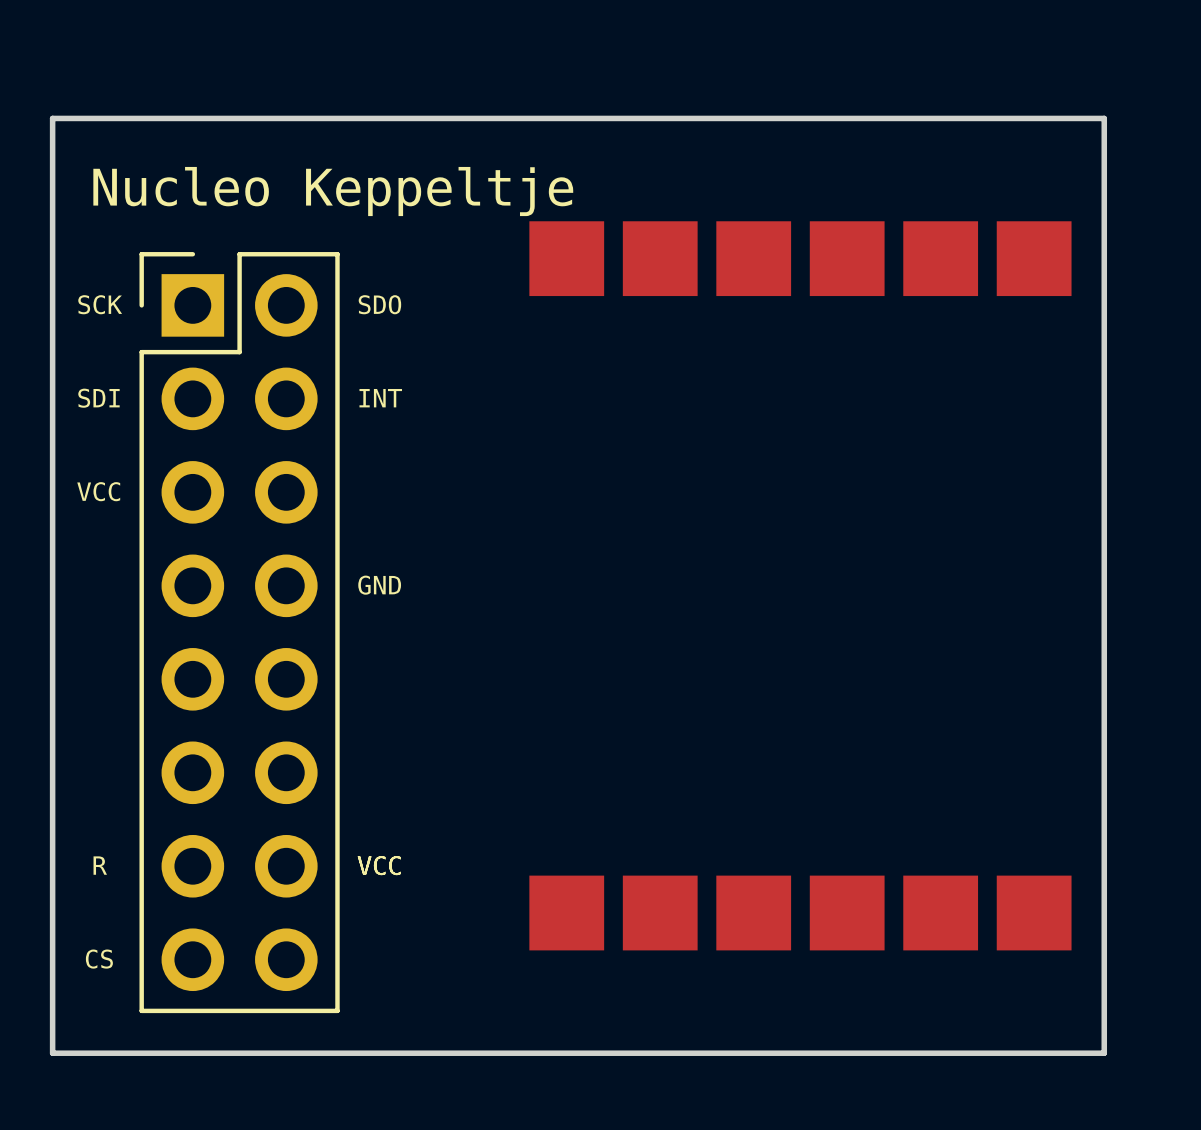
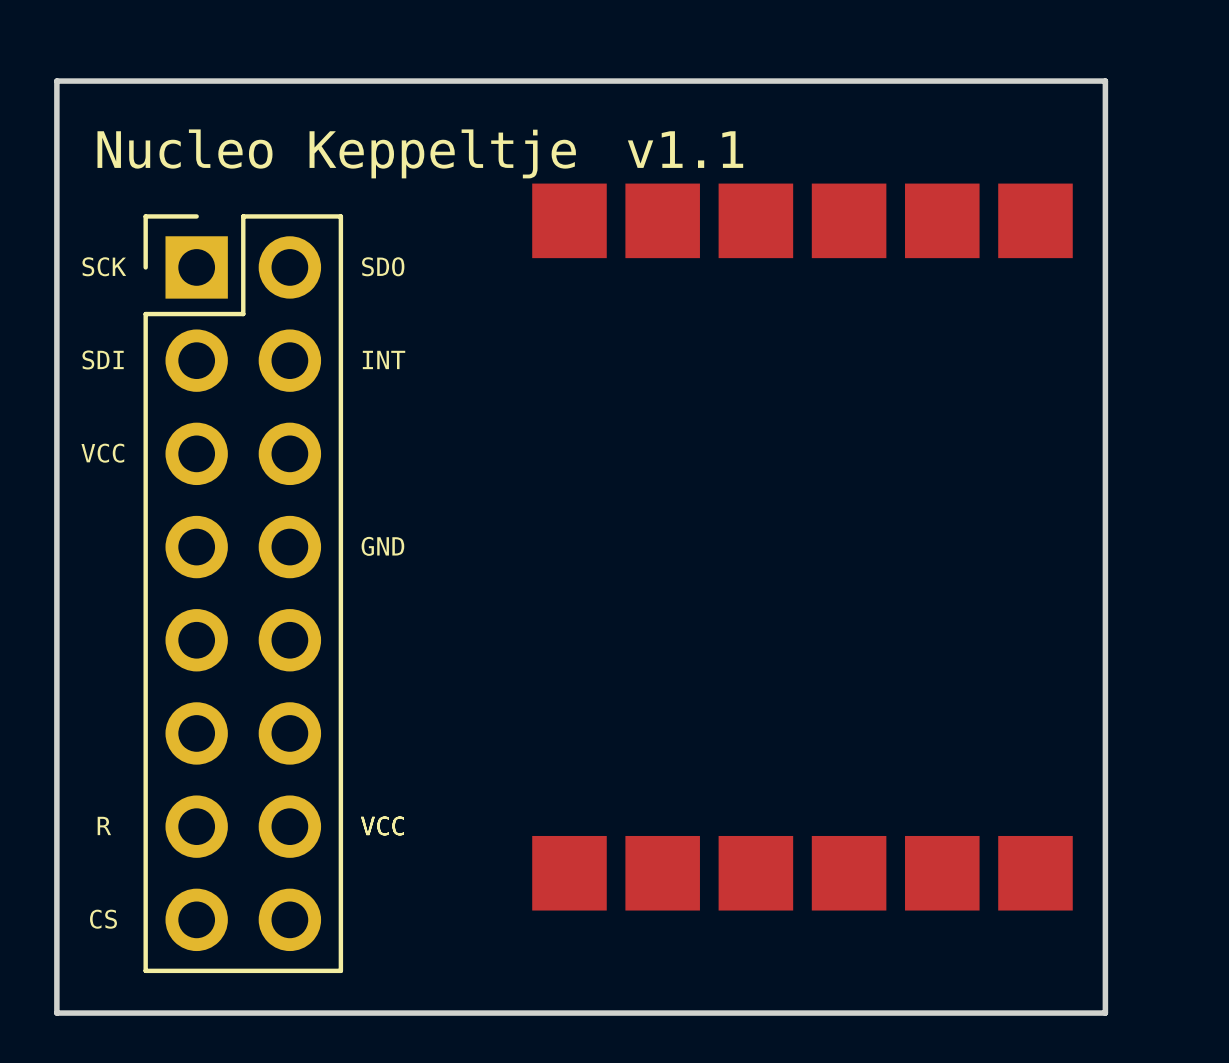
text: none -> v1.1 (685, 149)

